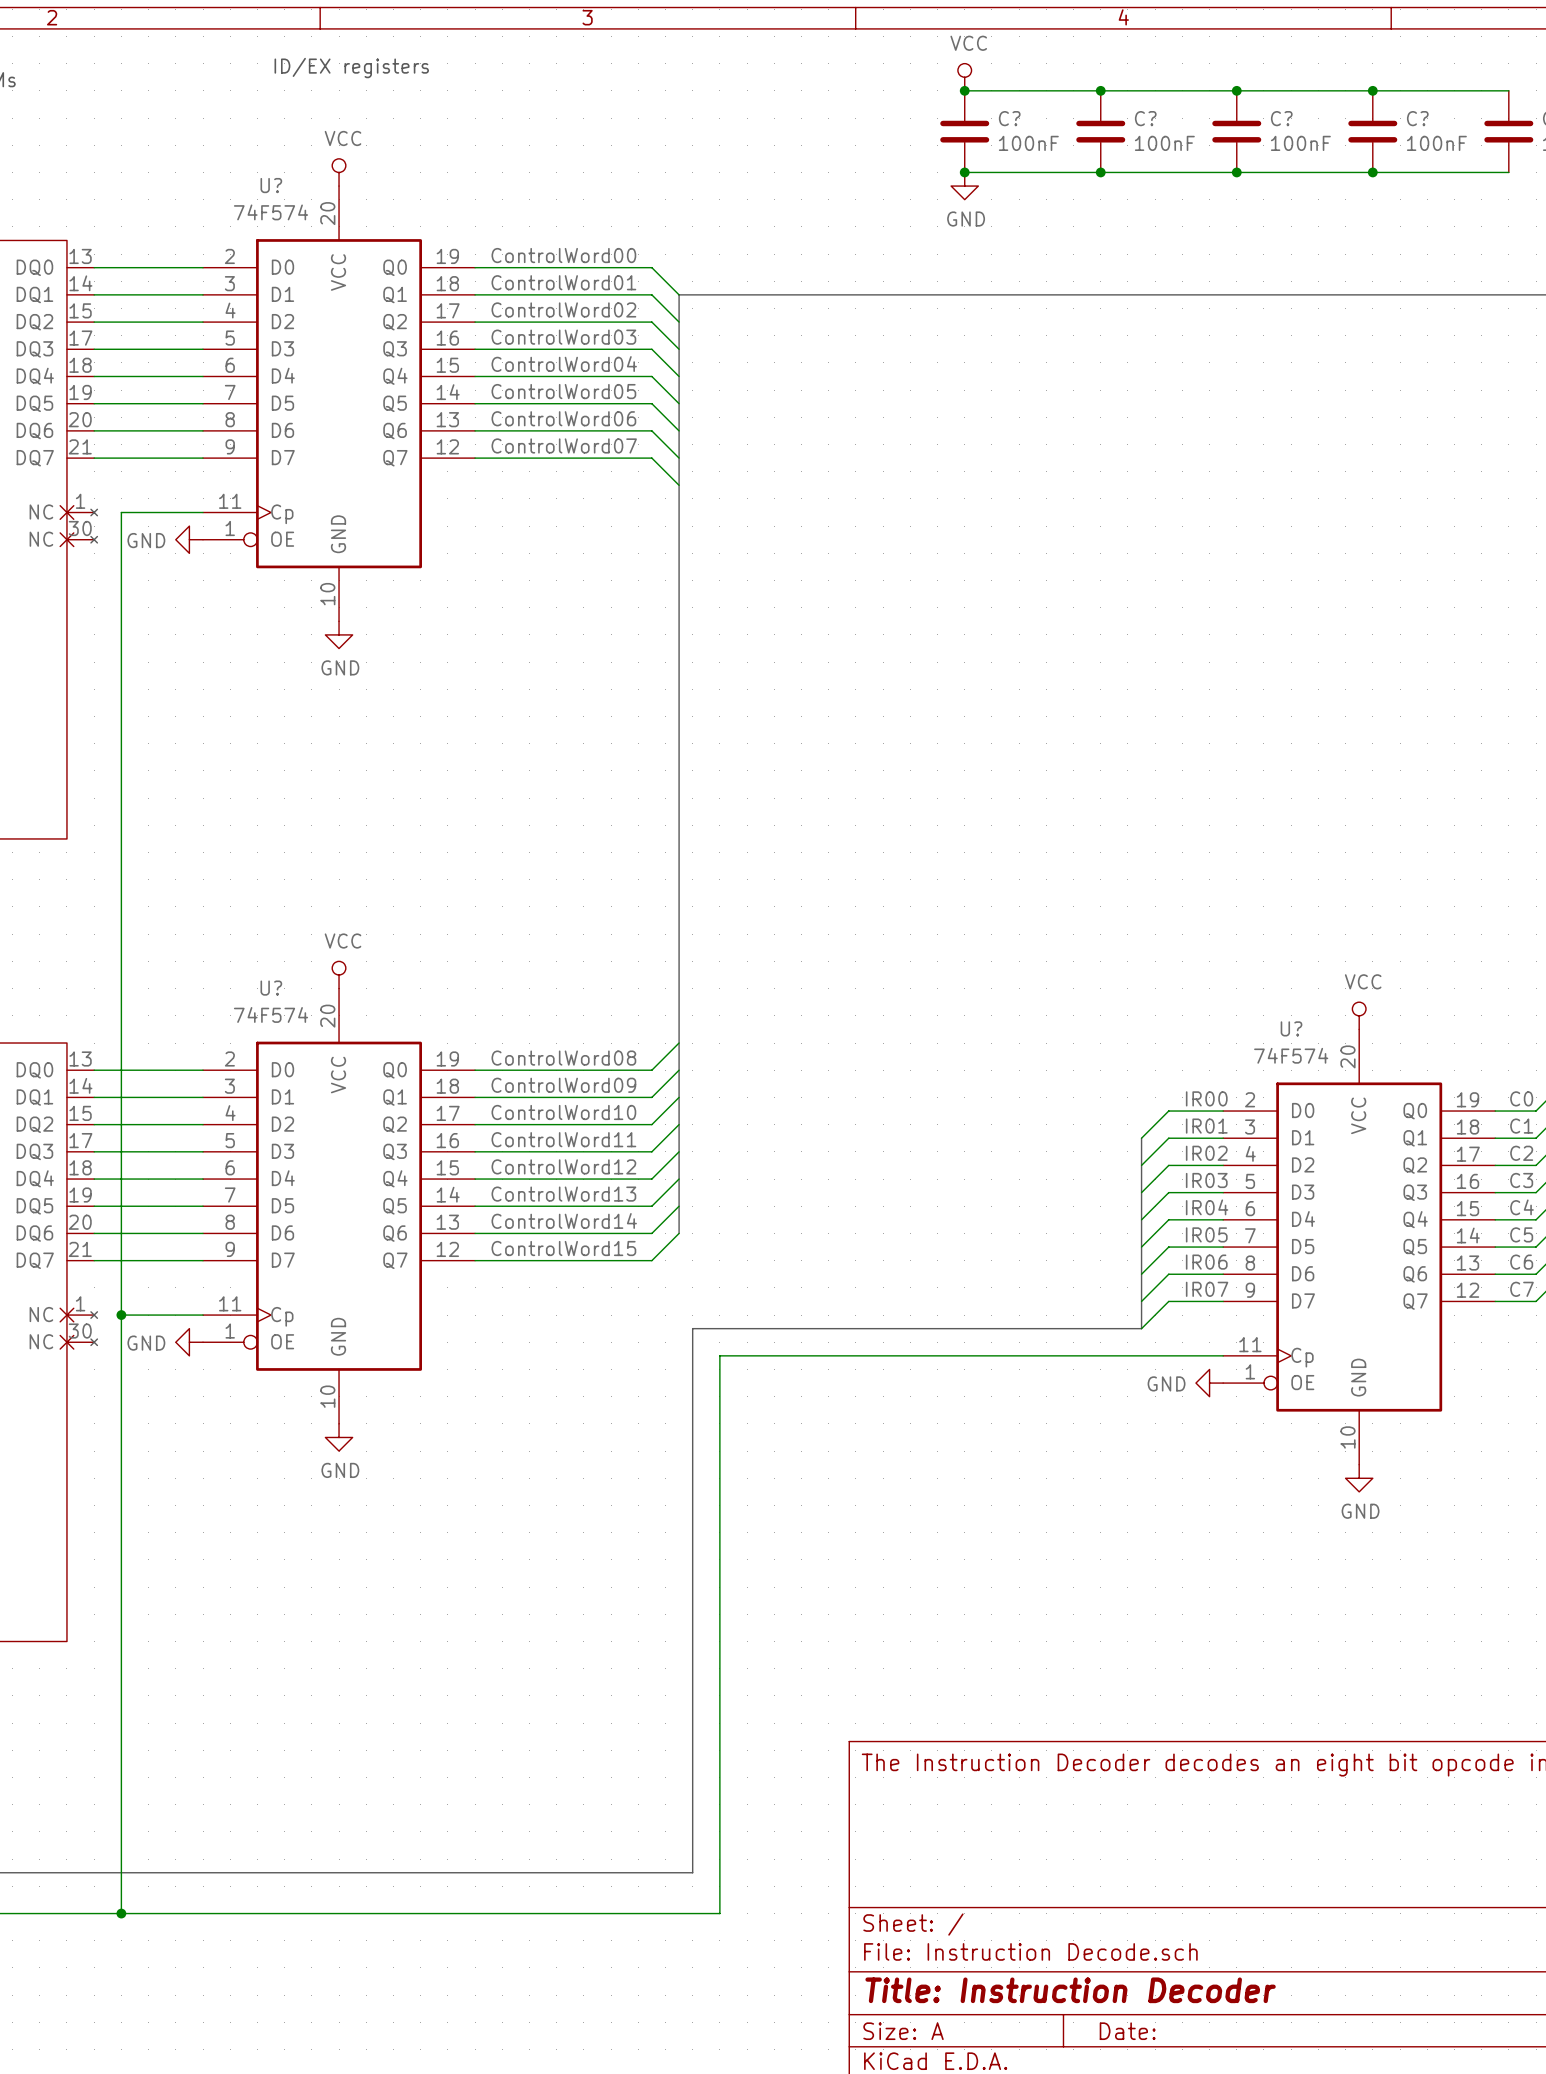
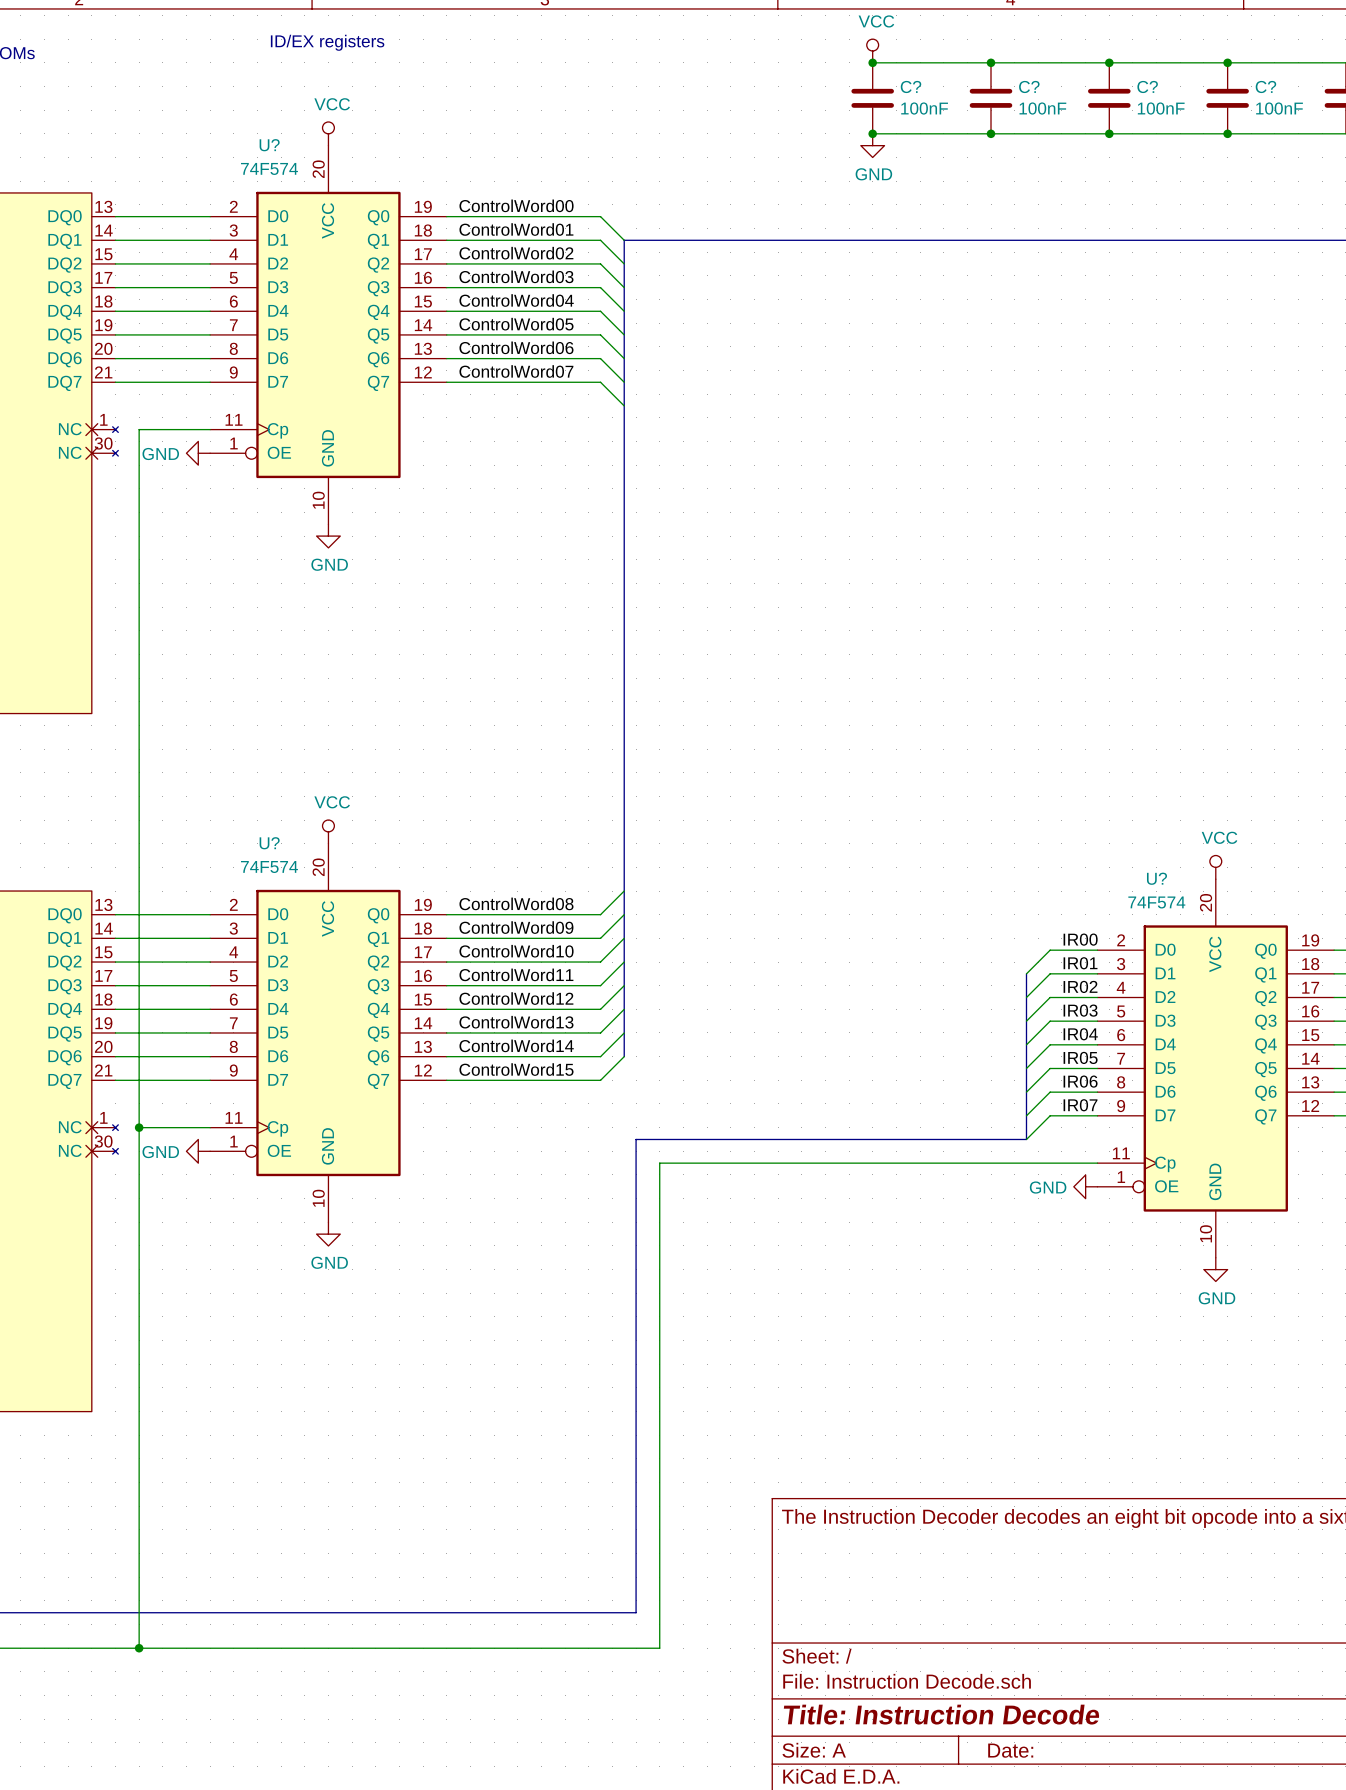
title block: Title: Instruction Decoder (1070, 1990) -> Title: Instruction Decode (941, 1714)

